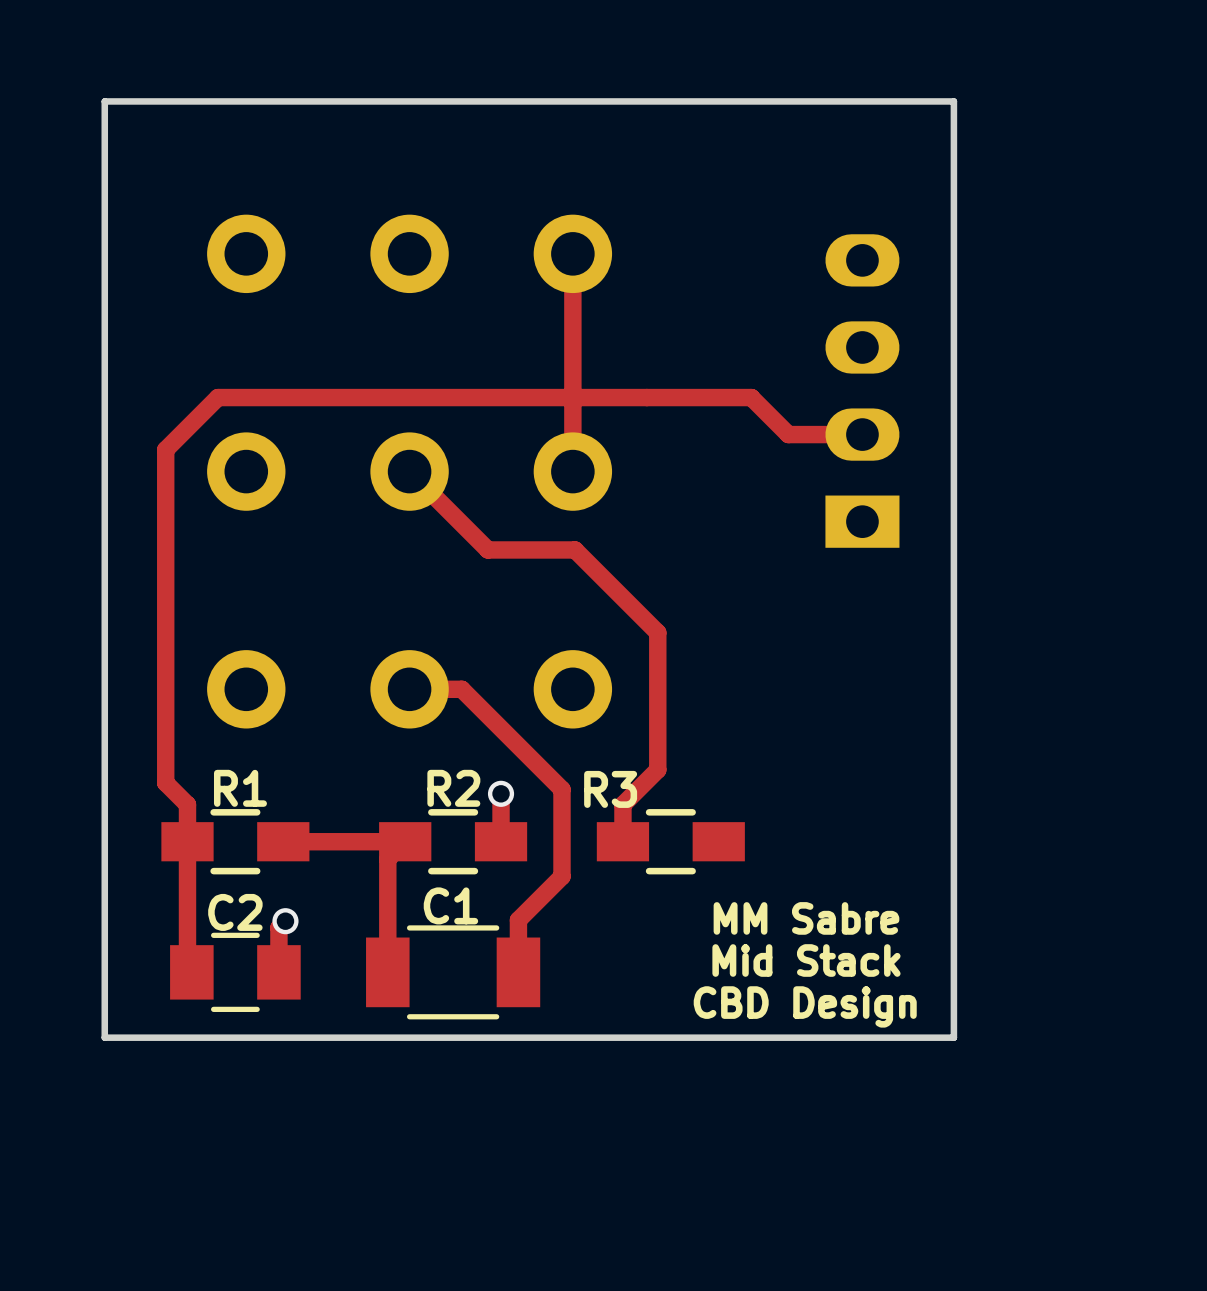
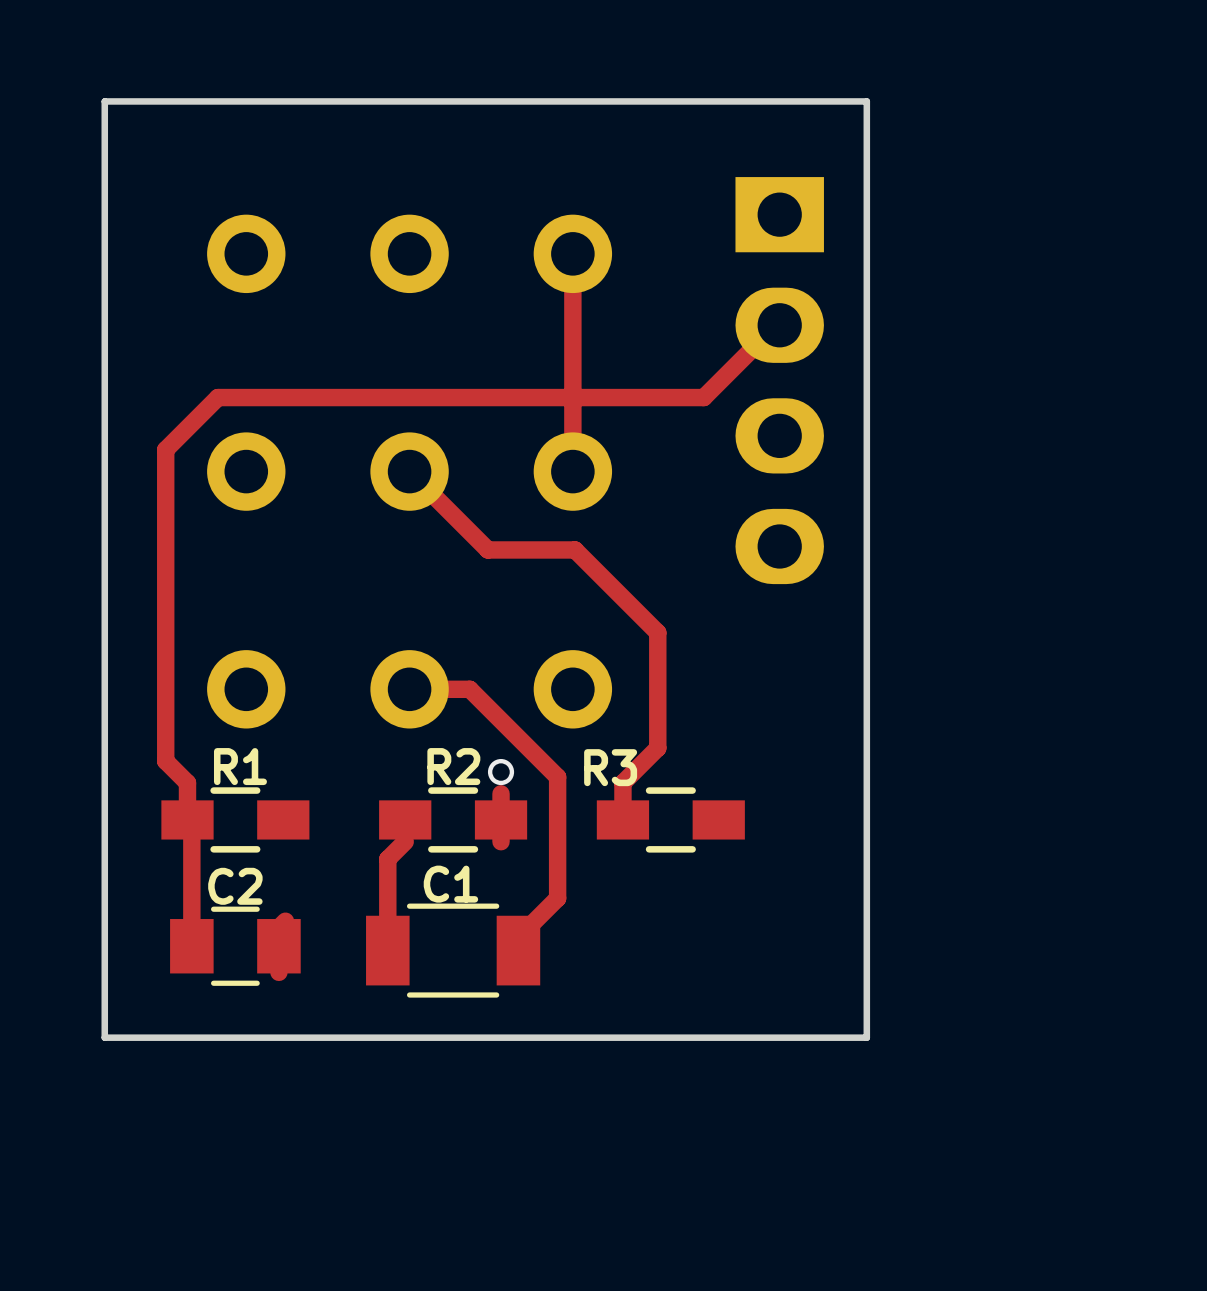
board edge: (866, 101) (953, 101) (953, 1037) (866, 1037) -> (866, 101) (866, 1037)
part: none -> (779, 380)
part: (862, 391) -> none
track: (703, 397) (751, 397) (788, 434) (862, 434) -> (703, 397) (773, 328) (779, 328)
track: (461, 689) (561, 789) (561, 876) (518, 920) (518, 937) -> (461, 689) (469, 689) (557, 777) (557, 898) (518, 937)
track: (657, 748) (657, 769) (622, 804) -> (657, 748) (622, 782) (622, 804)
track: (165, 761) (165, 782) (187, 804) -> (165, 761) (187, 782) (187, 804)
via position: (501, 793) -> (501, 772)
track: (187, 819) (187, 968) (191, 972) -> (187, 819) (191, 824) (191, 946)
R1 position: (235, 841) -> (235, 819)
track: (283, 841) (405, 841) (413, 850) -> none
R2 position: (453, 841) -> (453, 819)
R3 position: (670, 841) -> (670, 819)
text: MM Sabre (806, 918) -> none
via: (285, 921) -> none
text: Mid Stack (806, 960) -> none
C2 position: (235, 972) -> (235, 946)
C1 position: (453, 972) -> (453, 950)
text: CBD Design (805, 1006) -> none

